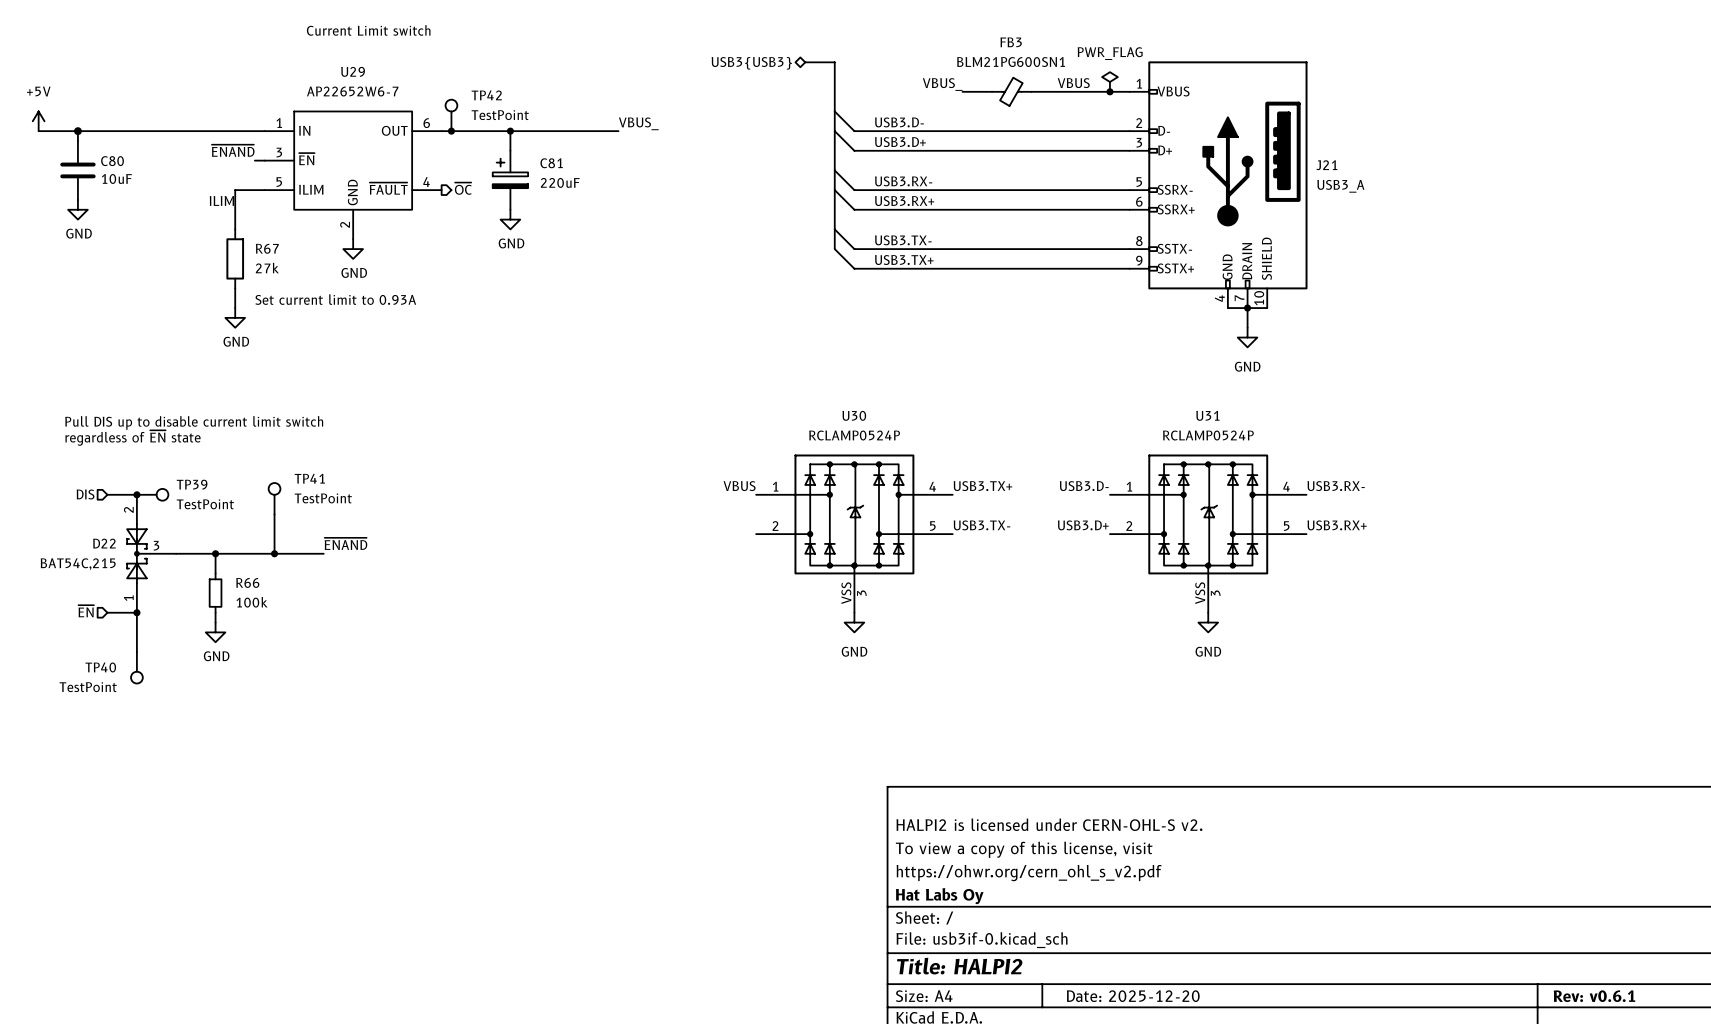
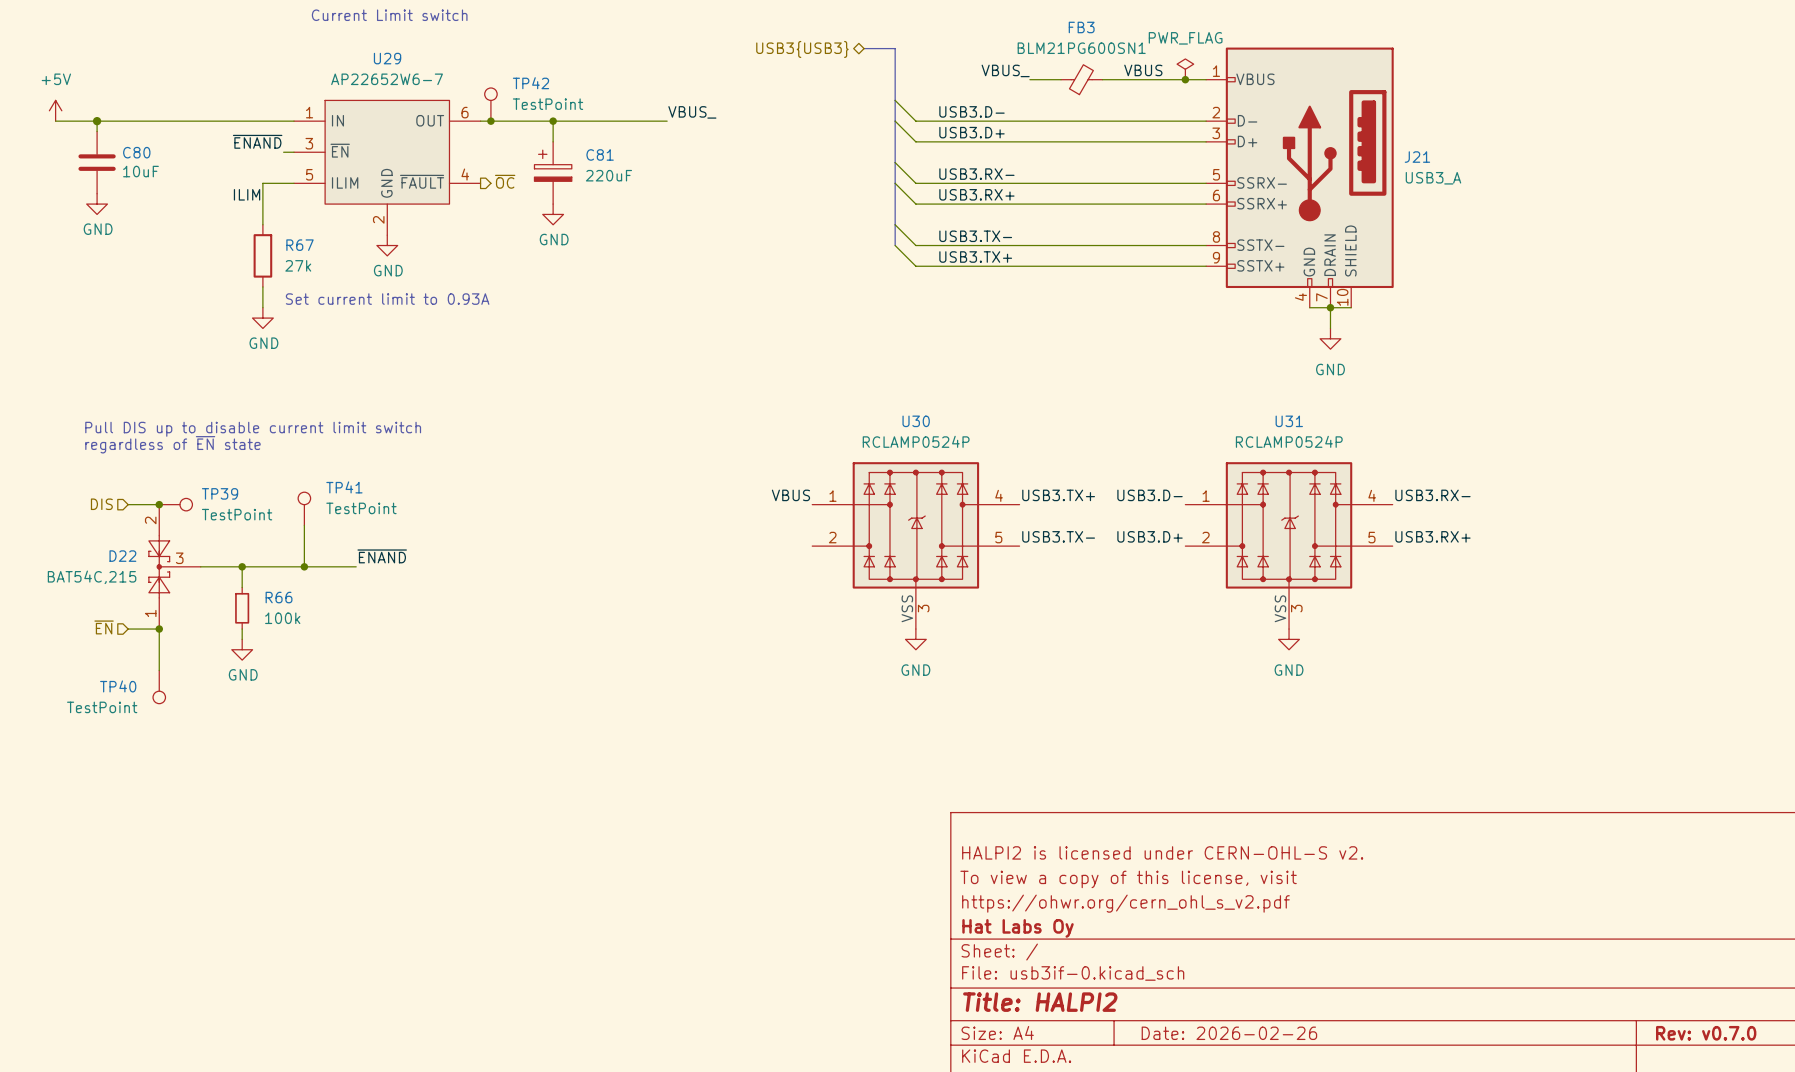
title block: Date: 2025-12-20 (1133, 996) -> Date: 2026-02-26 (1229, 1033)
title block: Rev: v0.6.1 (1594, 996) -> Rev: v0.7.0 (1706, 1033)

